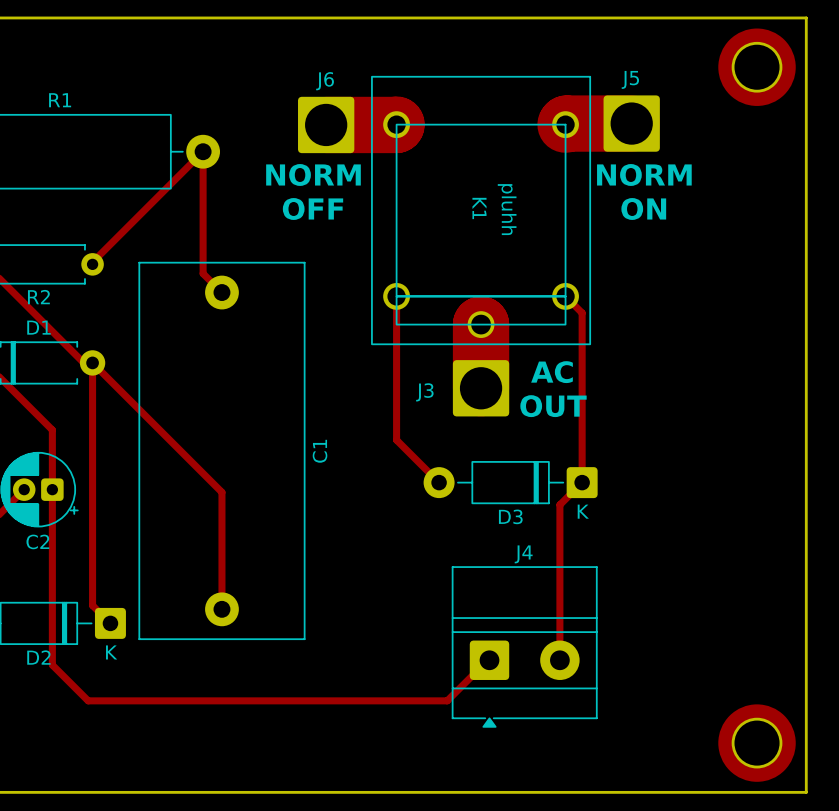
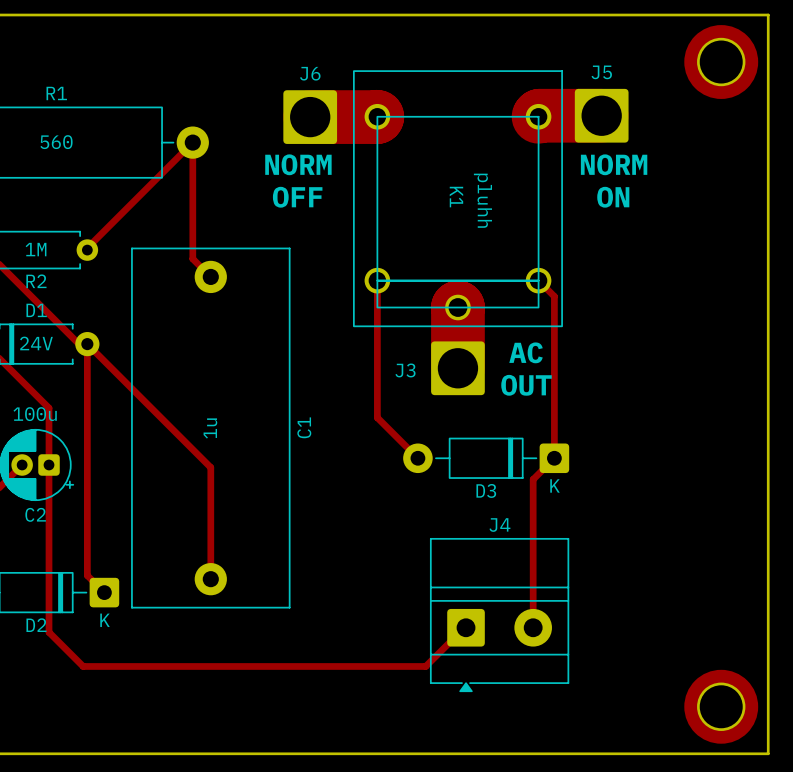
R1 value: none -> 560 (56, 142)
R2 value: none -> 1M (36, 249)
D1 value: none -> 24V (36, 343)
C2 value: none -> 100u (35, 414)
C1 value: none -> 1u (210, 428)

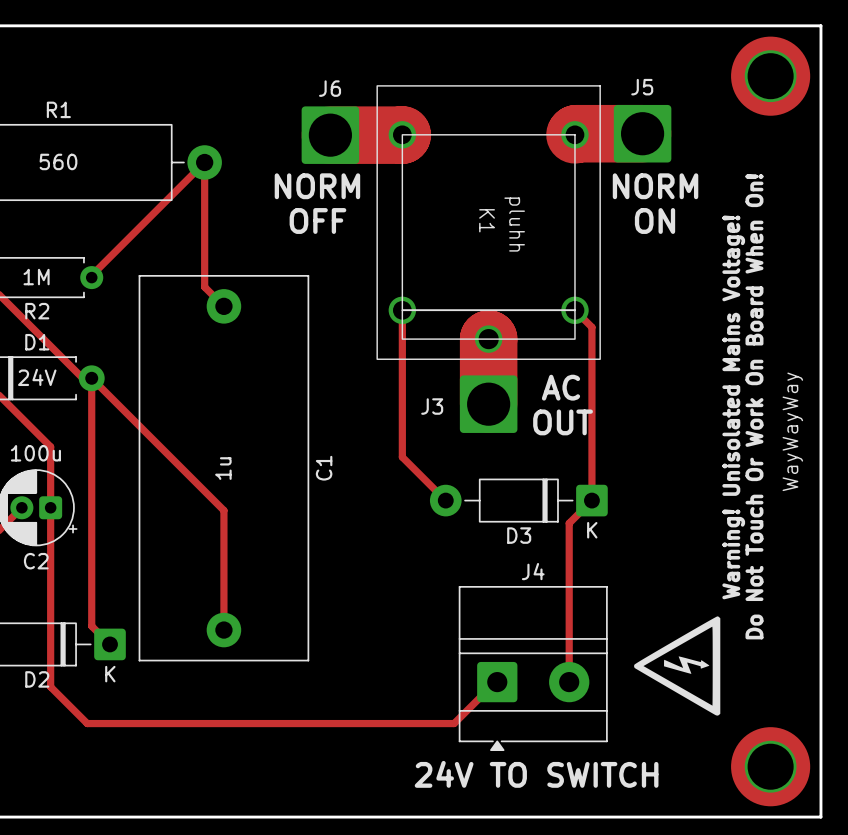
text: none -> Warning! Unisolated Mains Voltage! (733, 407)
text: none -> Do Not Touch Or Work On Board When On! (754, 406)
text: none -> WayWayWay (792, 431)
drawing: none -> [634, 616, 721, 716]
text: none -> 24V TO SWITCH (536, 774)

